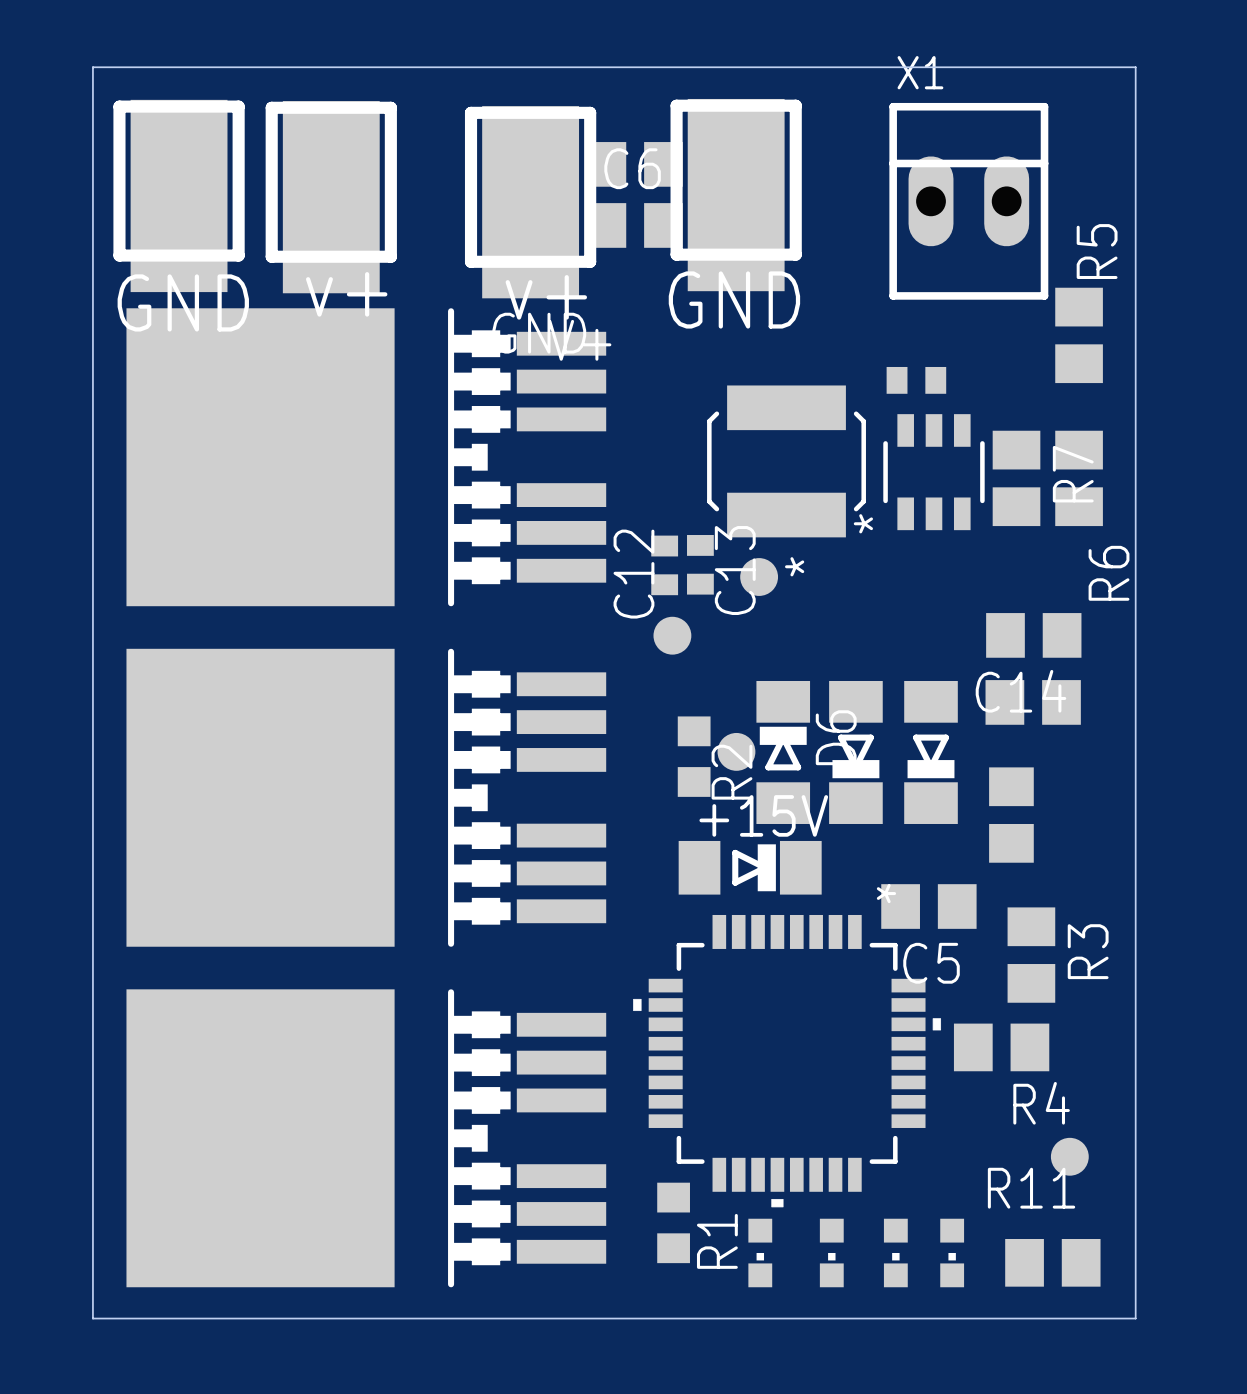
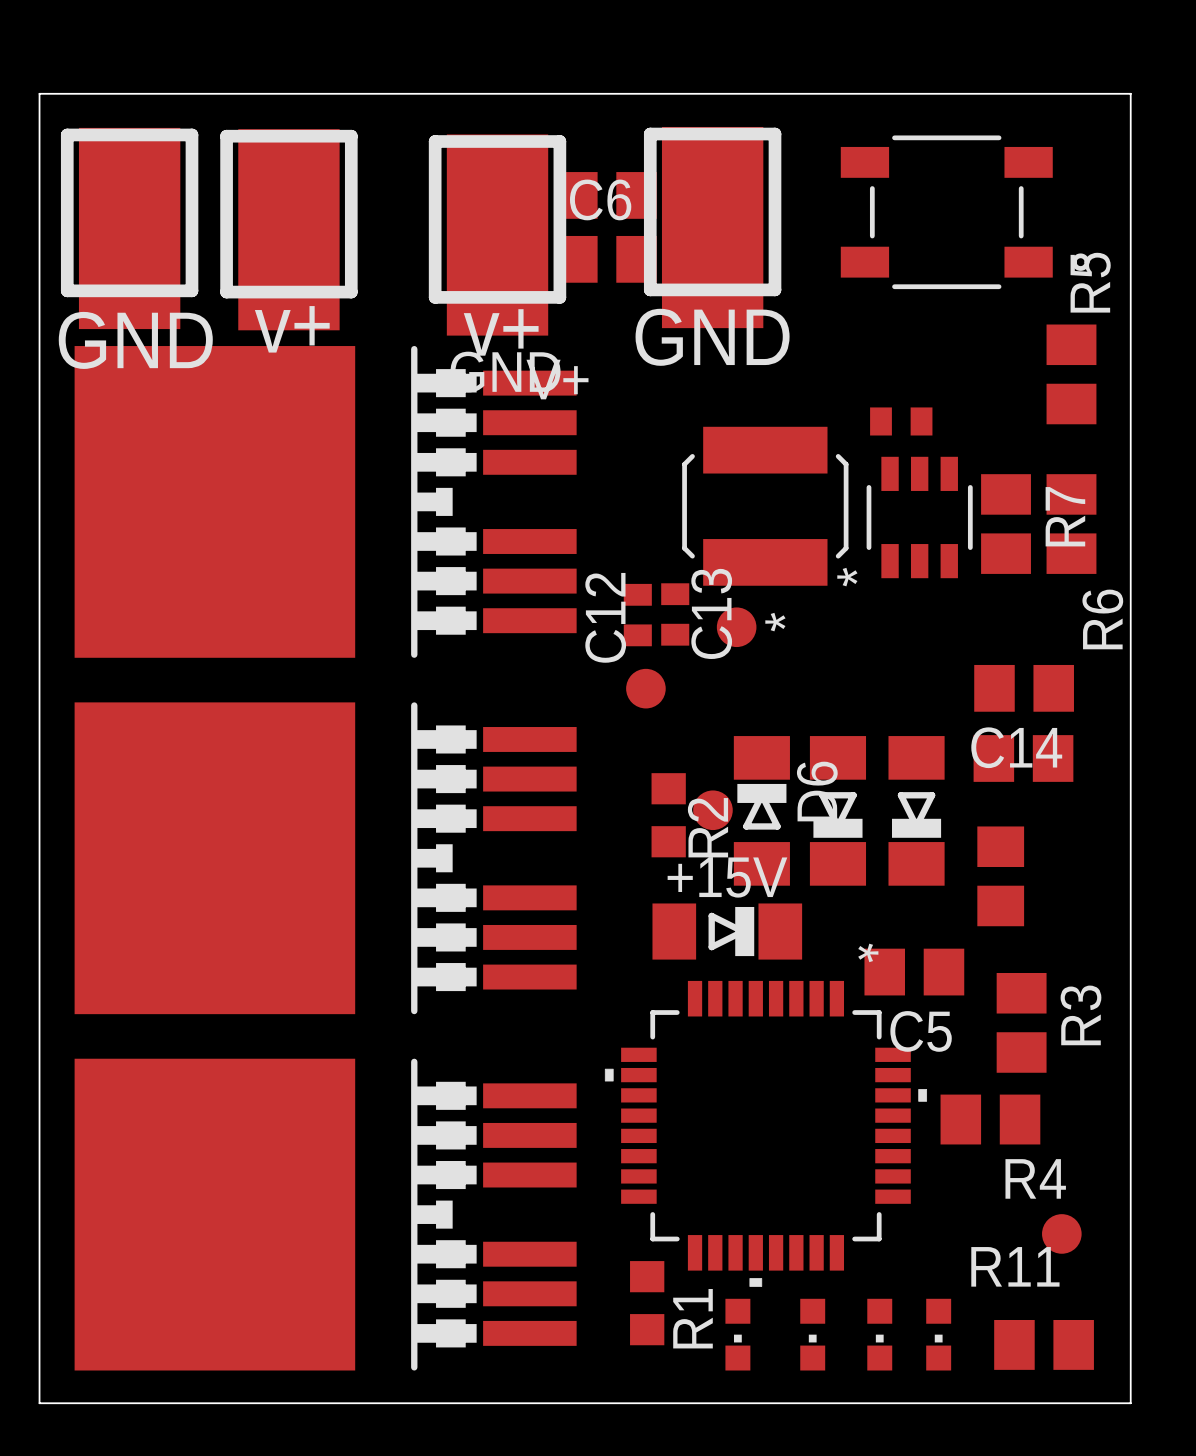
part: none -> (965, 212)
X1: (968, 201) -> none

